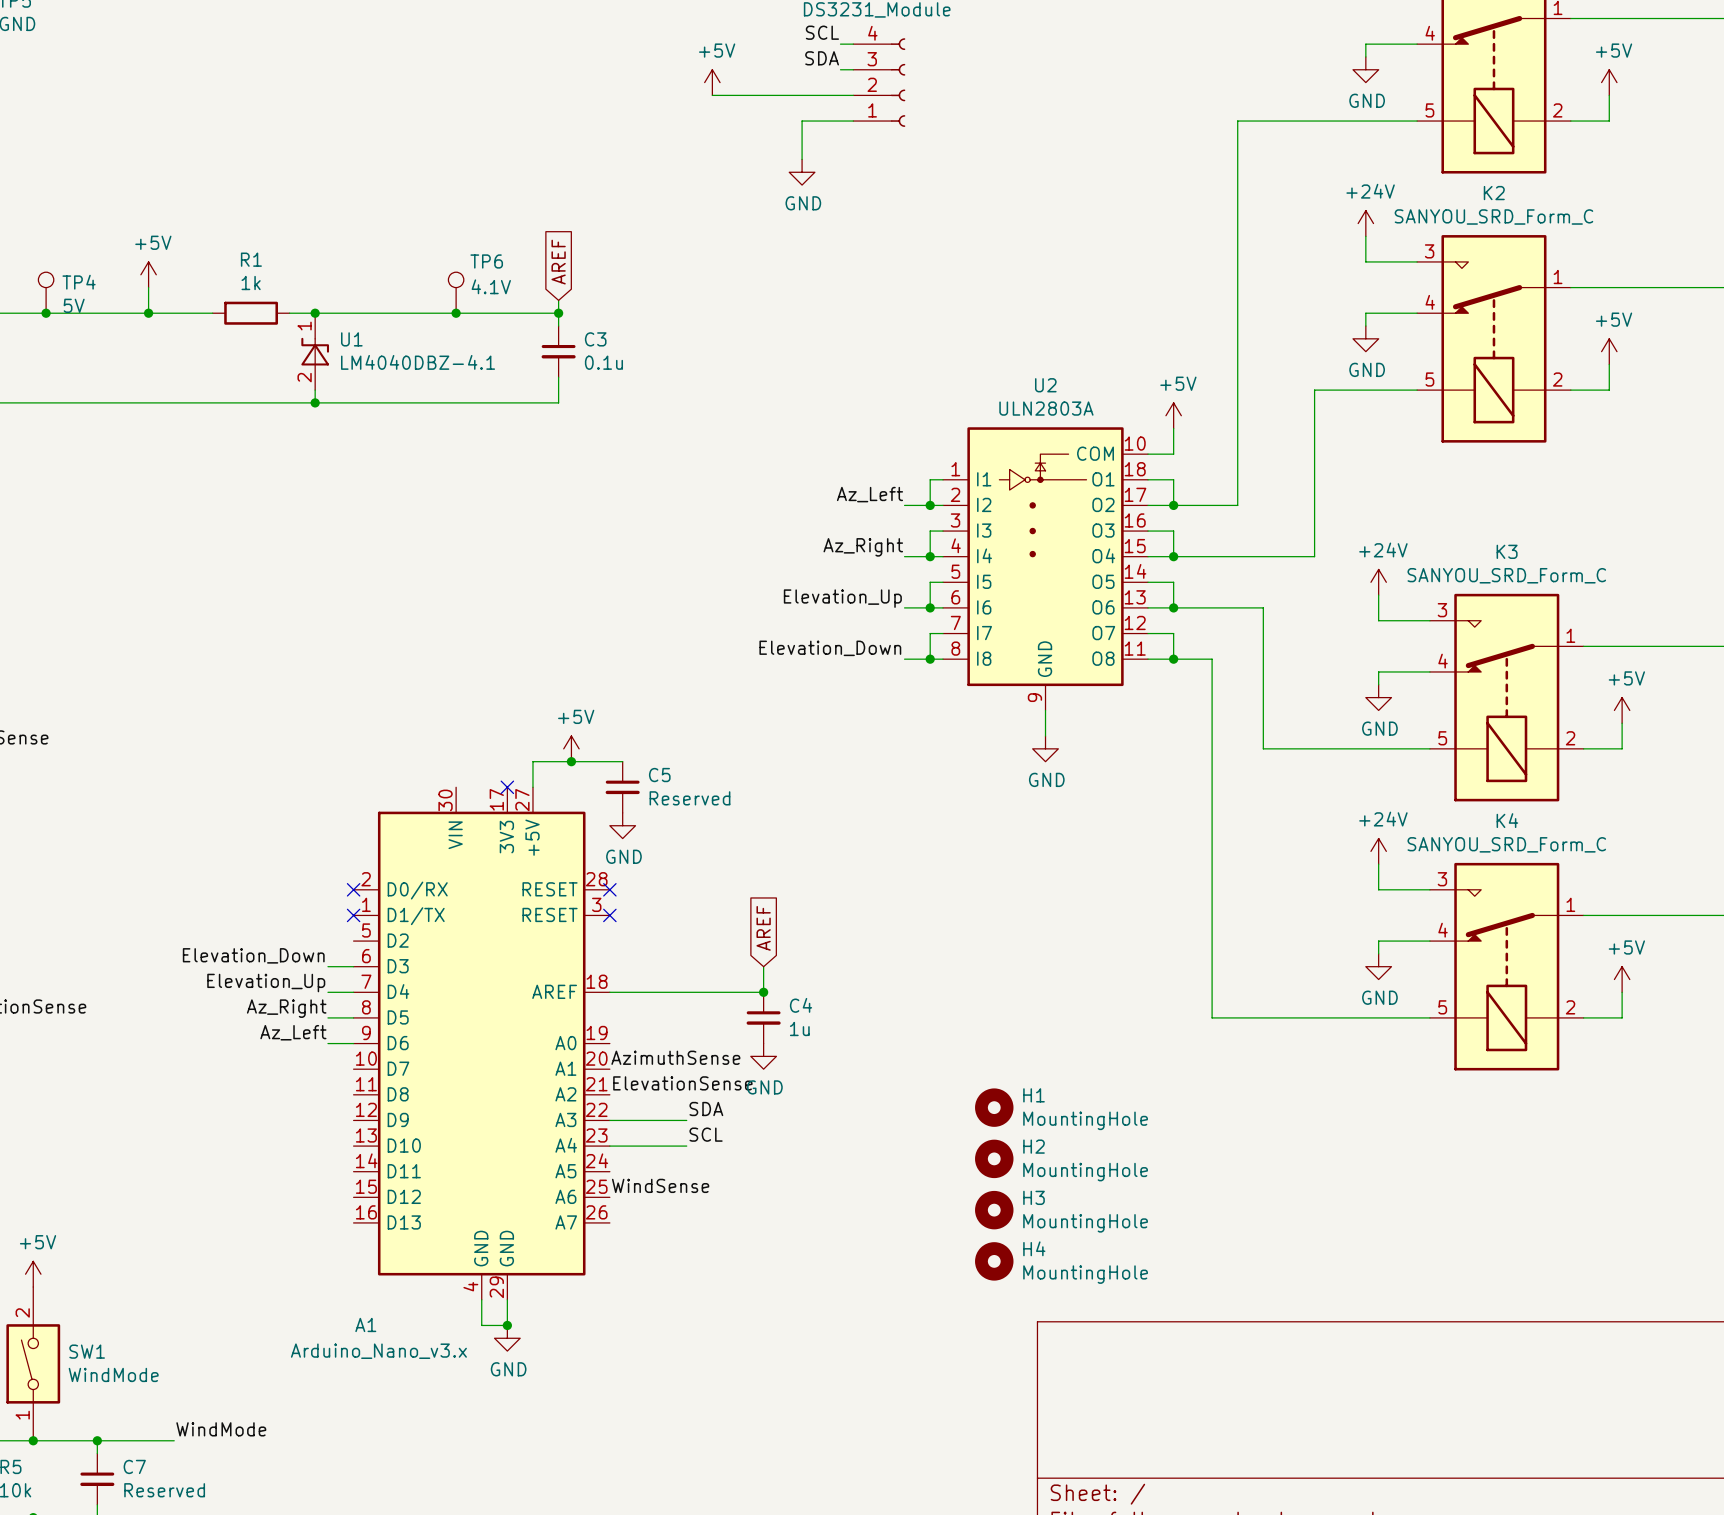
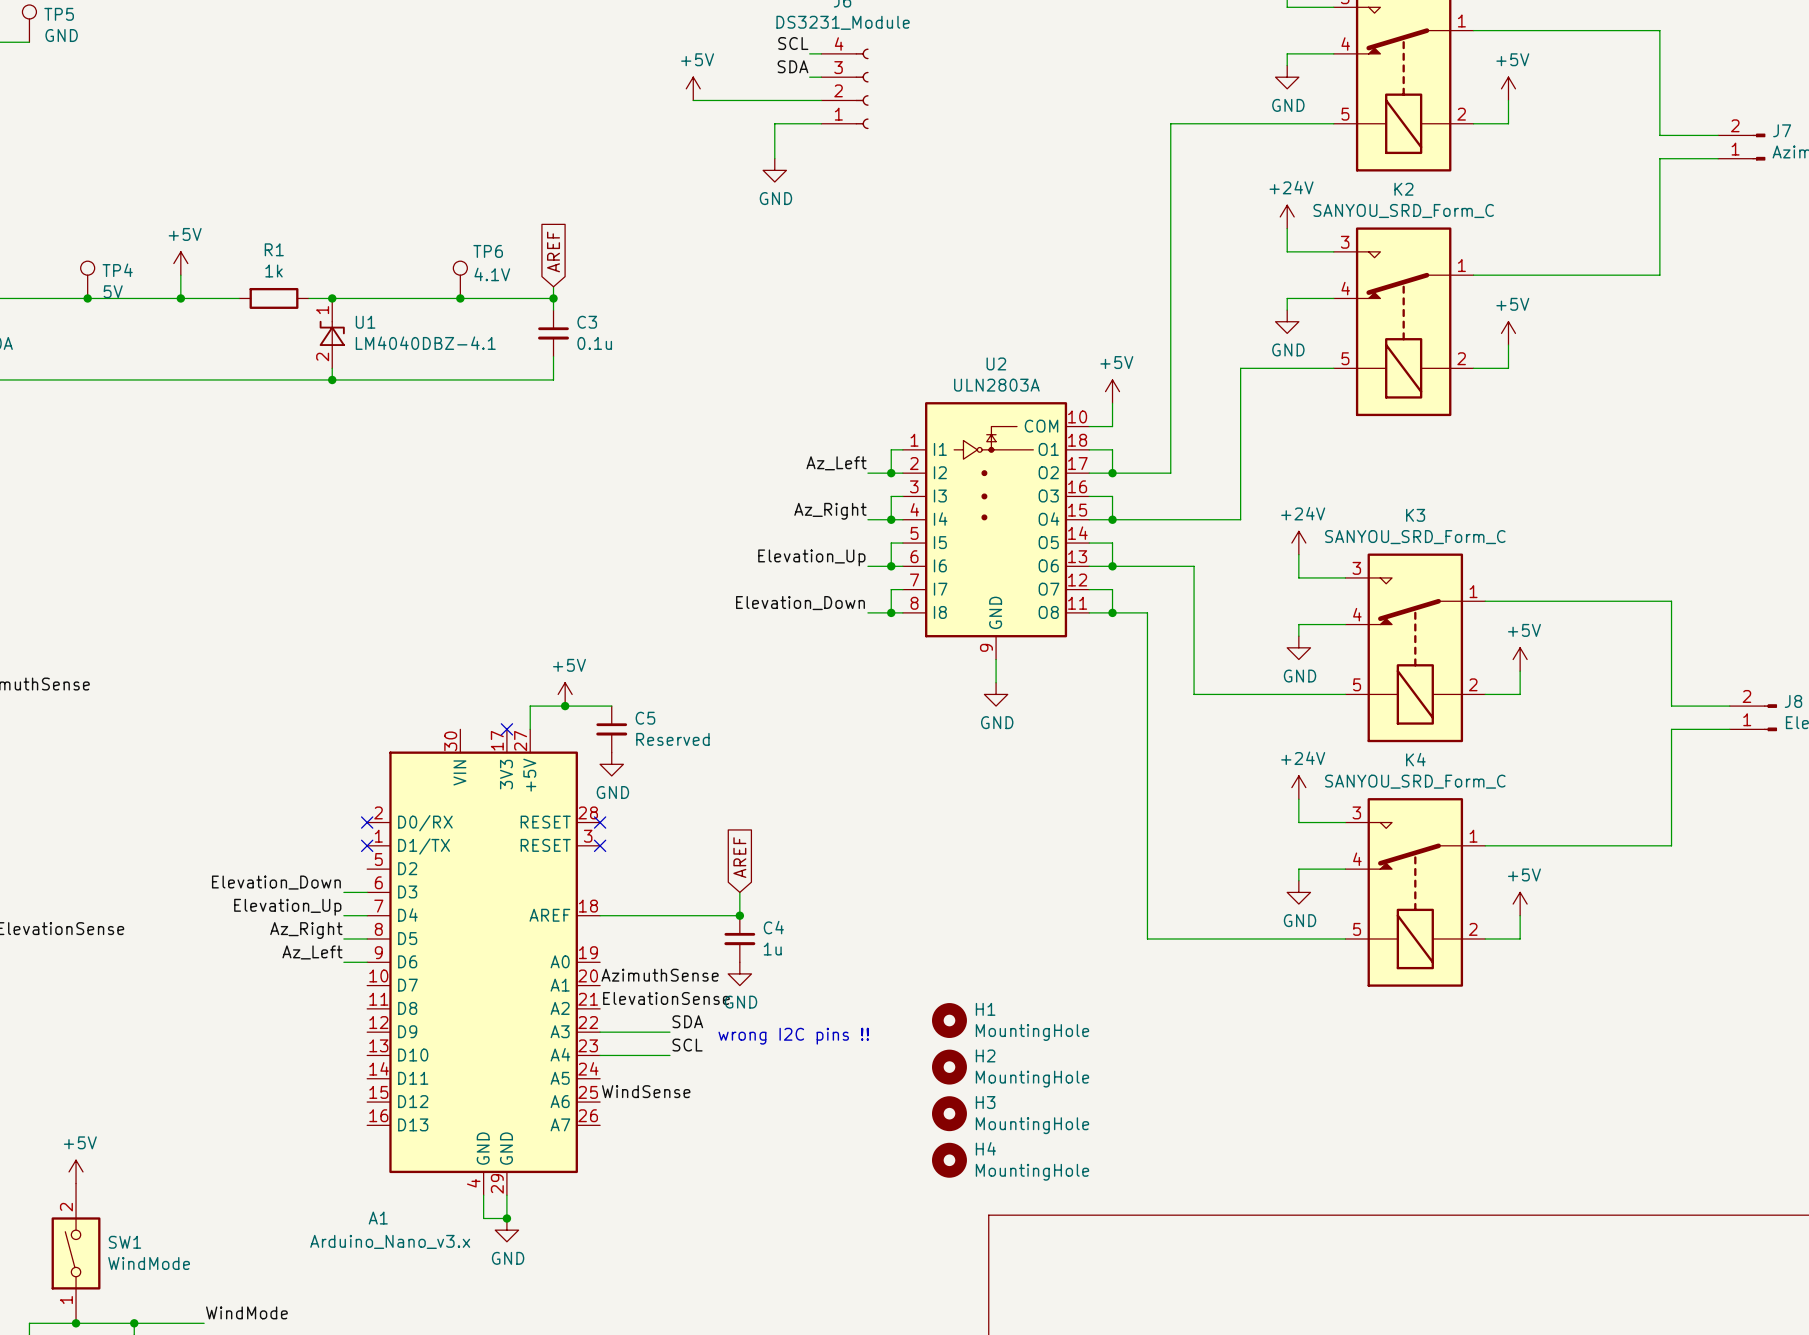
text: none -> wrong I2C pins !! (793, 1036)

